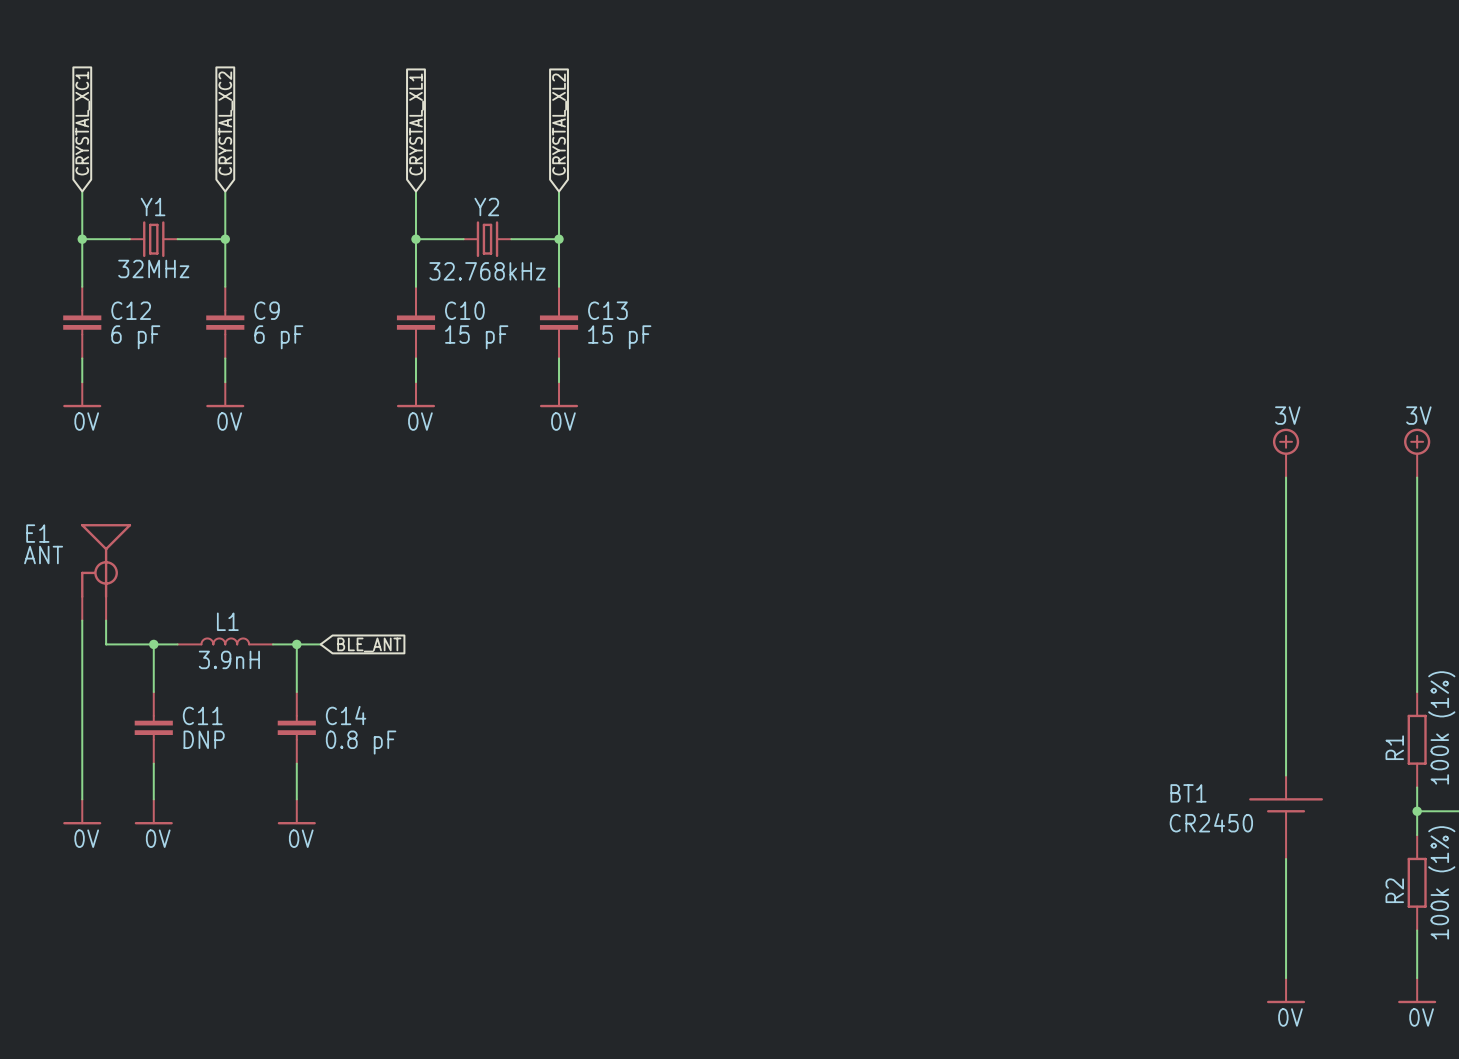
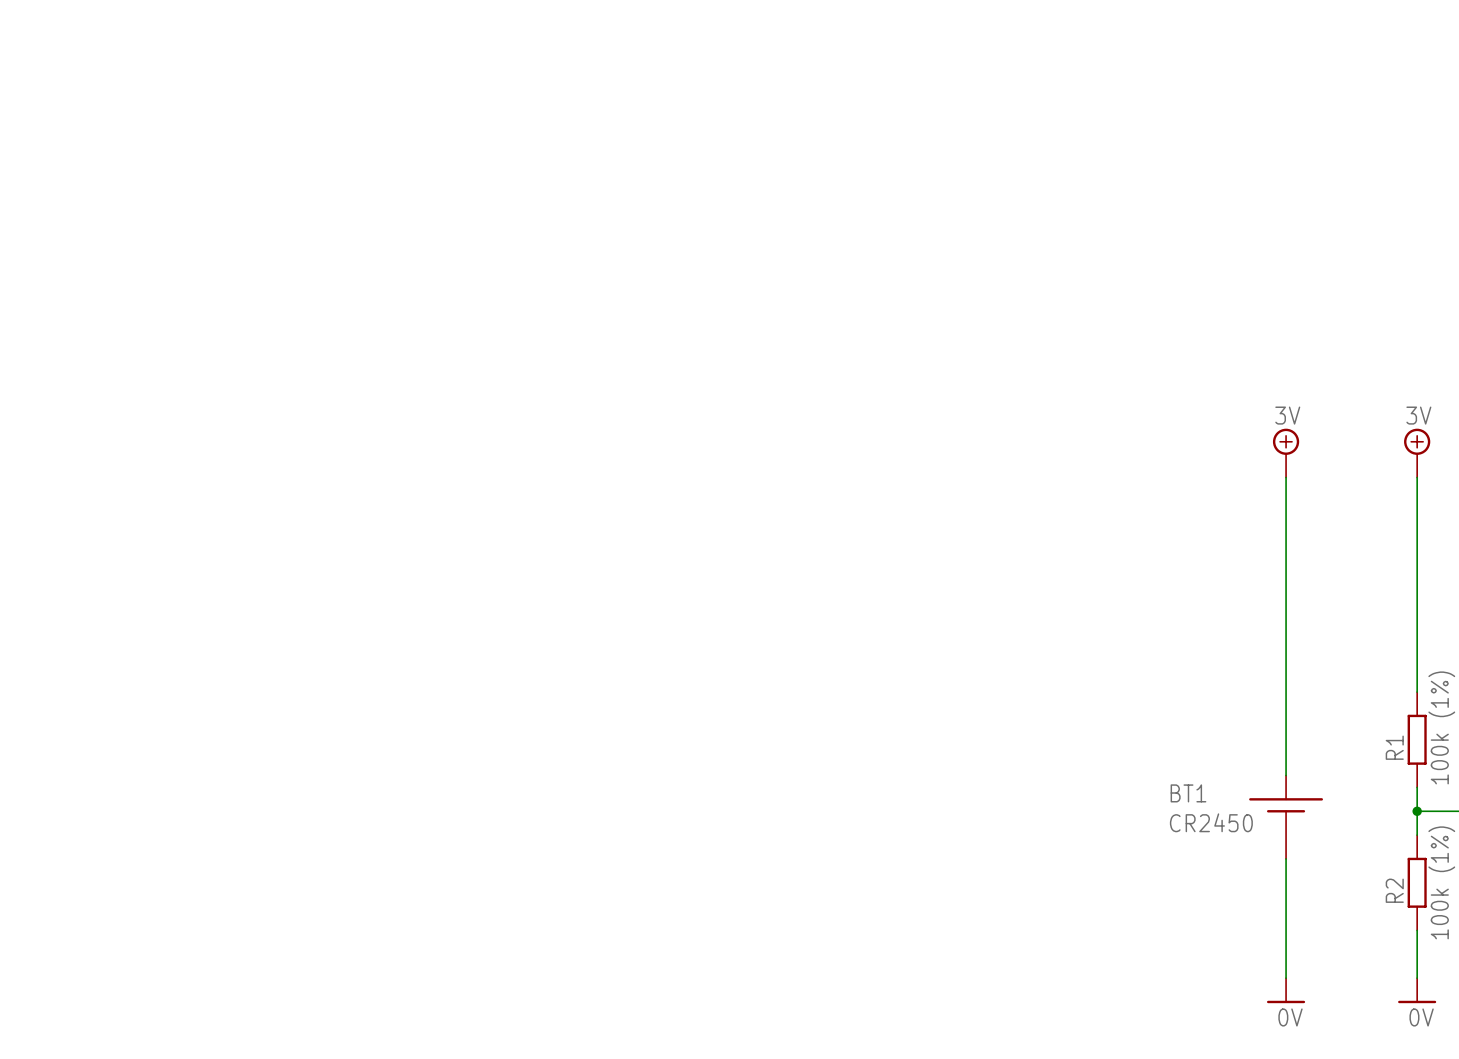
global label: CRYSTAL_XC1 (82, 123) -> none
global label: CRYSTAL_XC2 (225, 123) -> none
global label: CRYSTAL_XL1 (416, 124) -> none
global label: CRYSTAL_XL2 (559, 124) -> none
wire: (82, 191) (82, 286) -> none
wire: (225, 191) (225, 286) -> none
wire: (415, 191) (415, 286) -> none
wire: (559, 191) (559, 286) -> none
wire: (82, 239) (129, 239) -> none
junction: (82, 239) -> none
Y1: 32MHz (153, 239) -> none
wire: (177, 239) (225, 239) -> none
junction: (225, 239) -> none
wire: (415, 239) (463, 239) -> none
junction: (415, 239) -> none
Y2: 32.768kHz (487, 239) -> none
wire: (511, 239) (559, 239) -> none
junction: (559, 239) -> none
C12: 6 pF (82, 322) -> none
C9: 6 pF (225, 322) -> none
C10: 15 pF (415, 322) -> none
C13: 15 pF (559, 322) -> none
wire: (82, 358) (82, 382) -> none
wire: (225, 358) (225, 382) -> none
wire: (415, 358) (415, 382) -> none
wire: (559, 358) (559, 382) -> none
power symbol: 0V (82, 394) -> none
power symbol: 0V (225, 394) -> none
power symbol: 0V (415, 394) -> none
power symbol: 0V (559, 394) -> none
E1: ANT (106, 572) -> none
wire: (82, 620) (82, 799) -> none
wire: (106, 620) (106, 644) (177, 644) -> none
L1: 3.9nH (225, 641) -> none
wire: (153, 644) (153, 692) -> none
junction: (153, 644) -> none
wire: (272, 644) (320, 644) -> none
wire: (296, 644) (296, 692) -> none
junction: (296, 644) -> none
global label: BLE_ANT (369, 644) -> none
C11: DNP (153, 727) -> none
C14: 0.8 pF (296, 727) -> none
wire: (153, 763) (153, 799) -> none
wire: (296, 763) (296, 799) -> none
power symbol: 0V (82, 811) -> none
power symbol: 0V (153, 811) -> none
power symbol: 0V (296, 811) -> none

